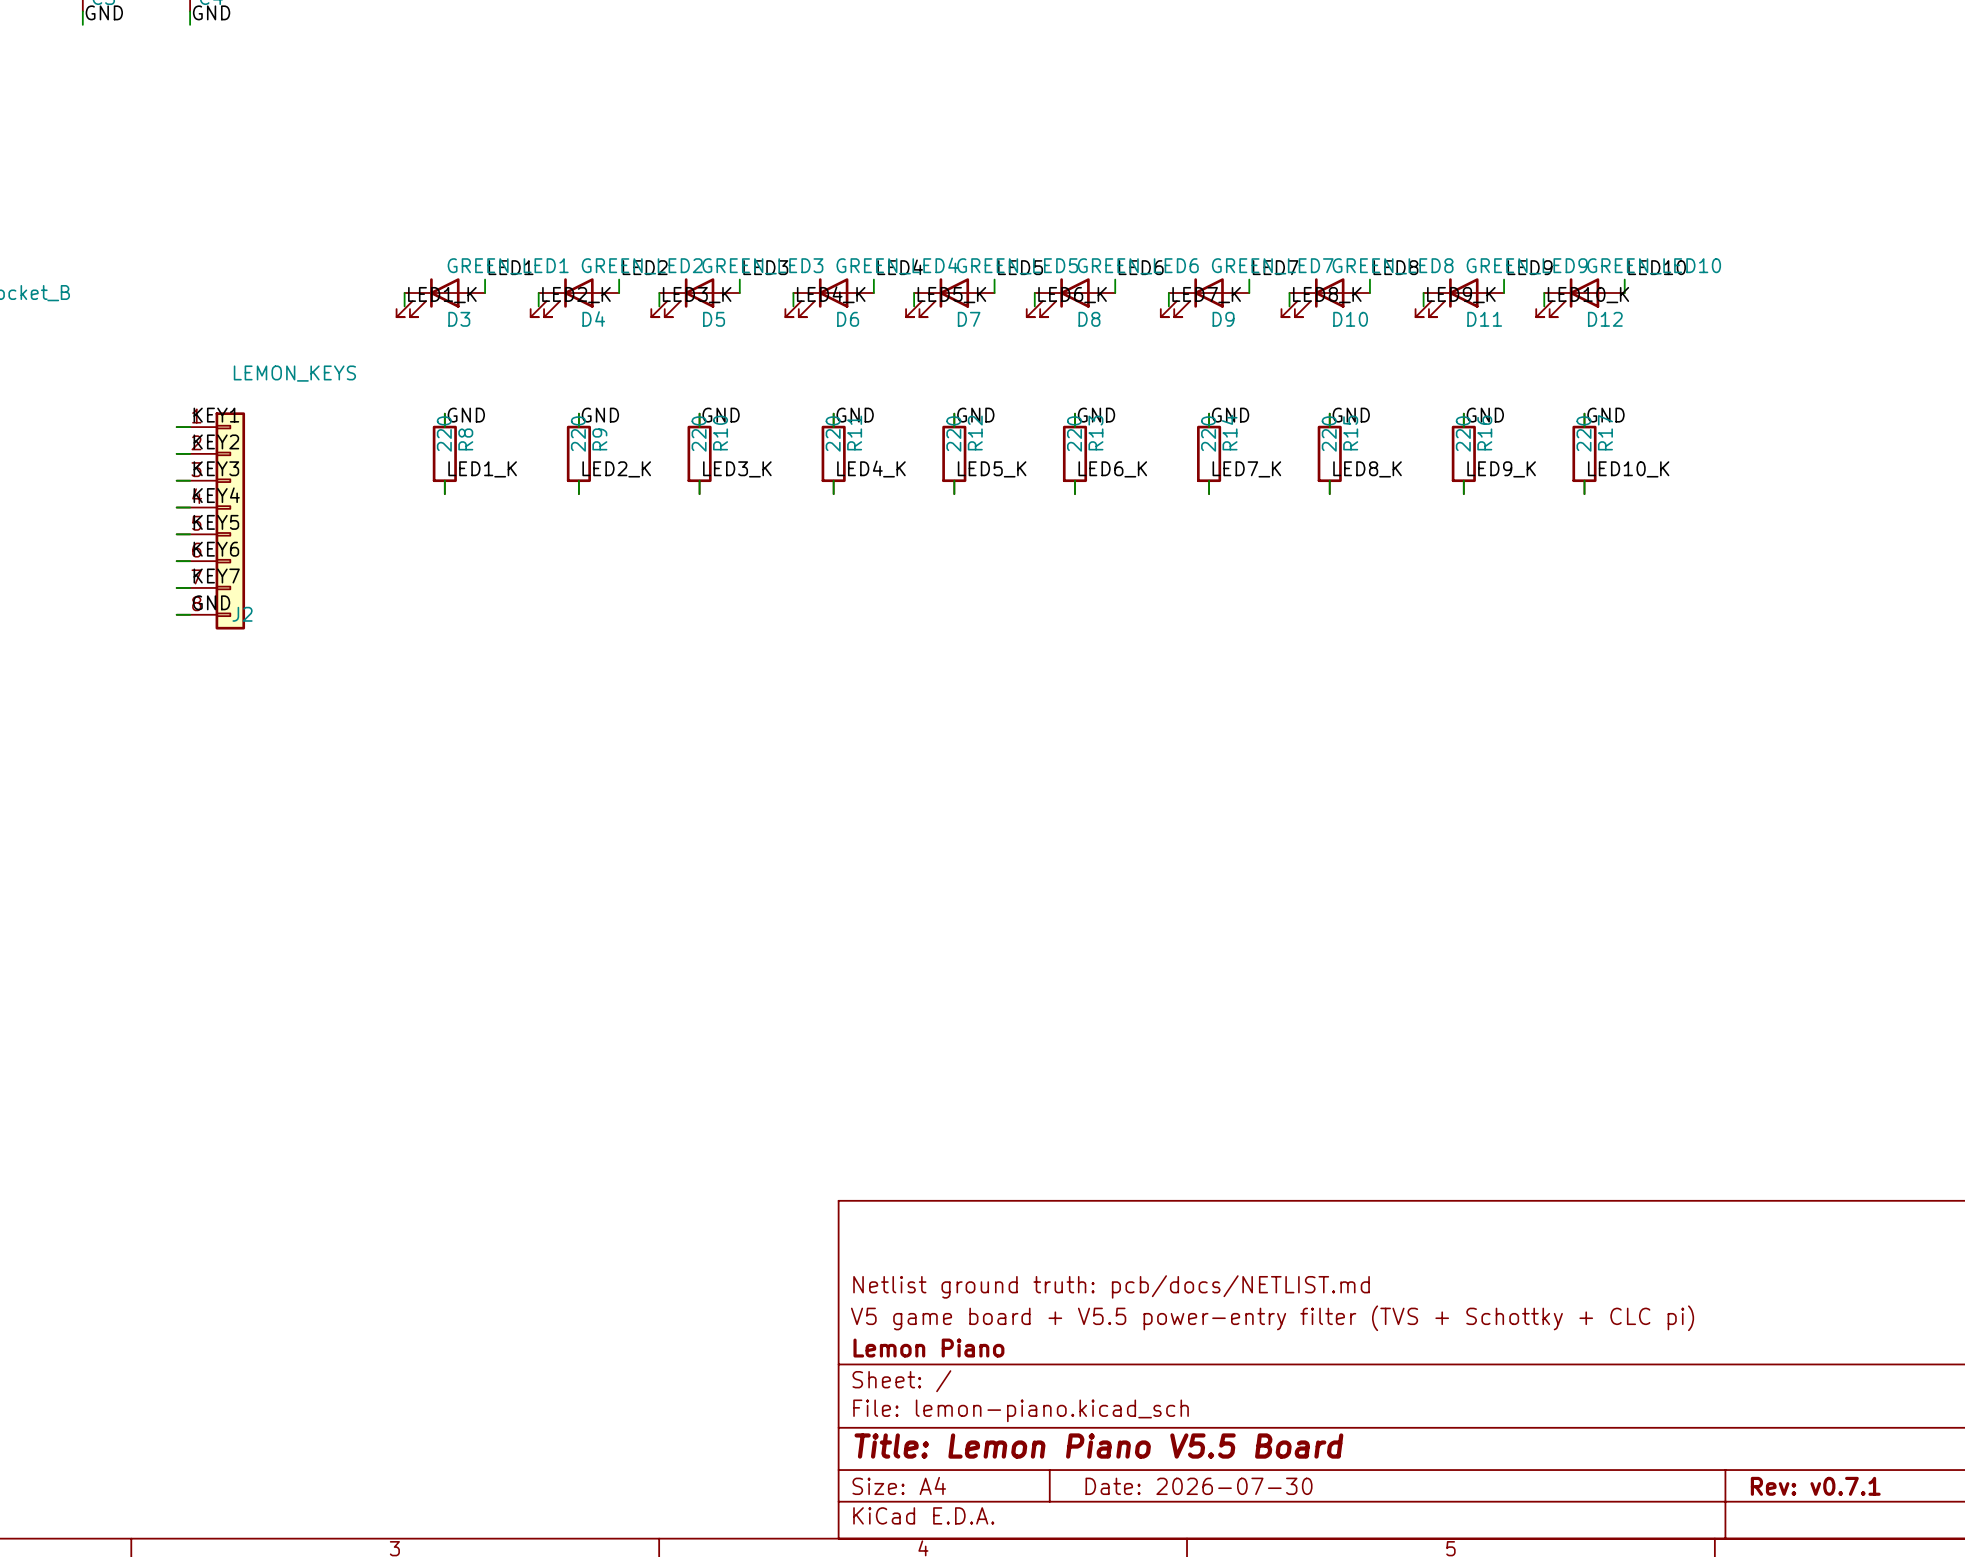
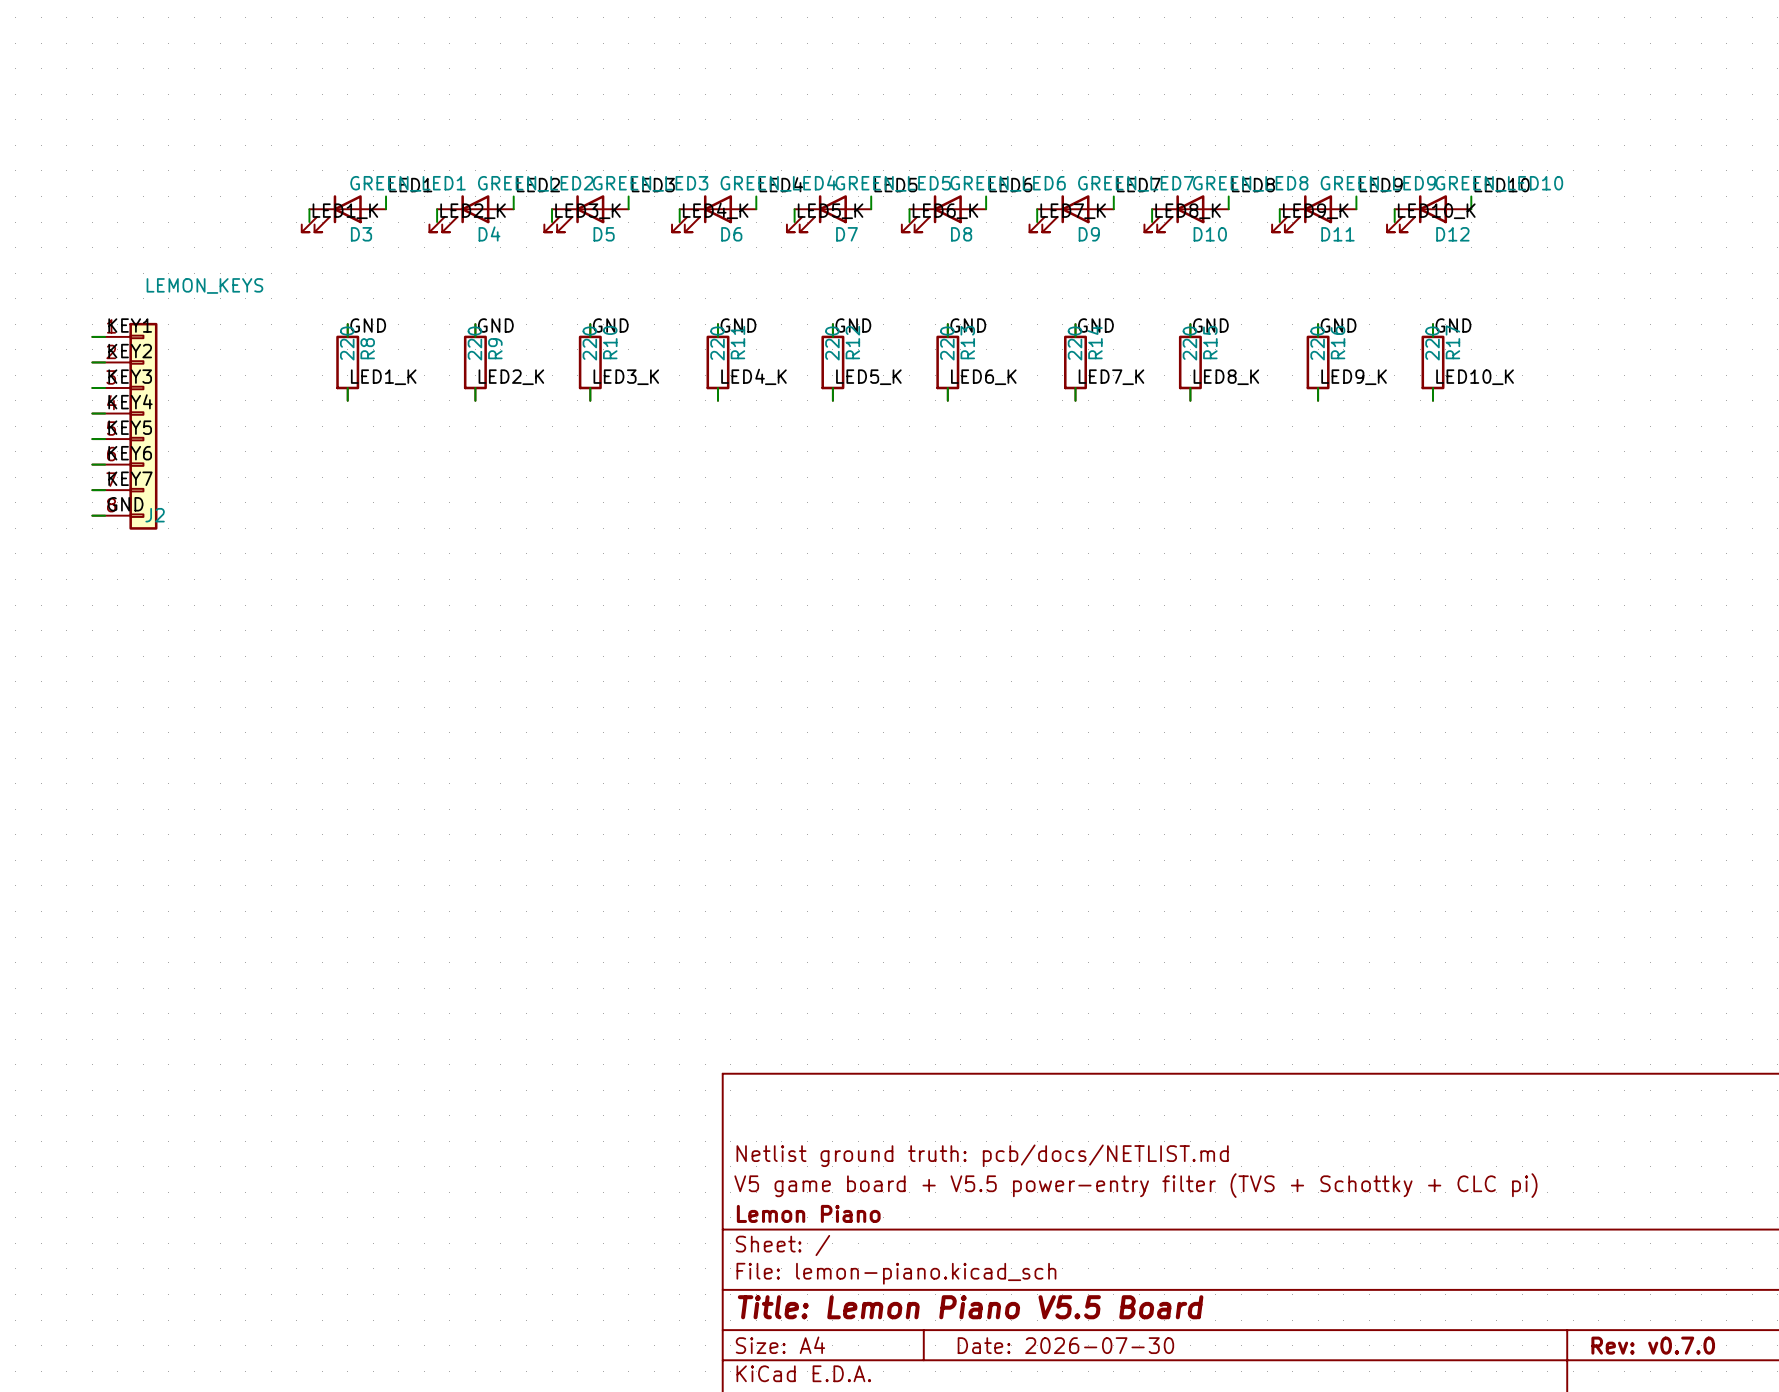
title block: Rev: v0.7.1 (1815, 1486) -> Rev: v0.7.0 (1653, 1345)

